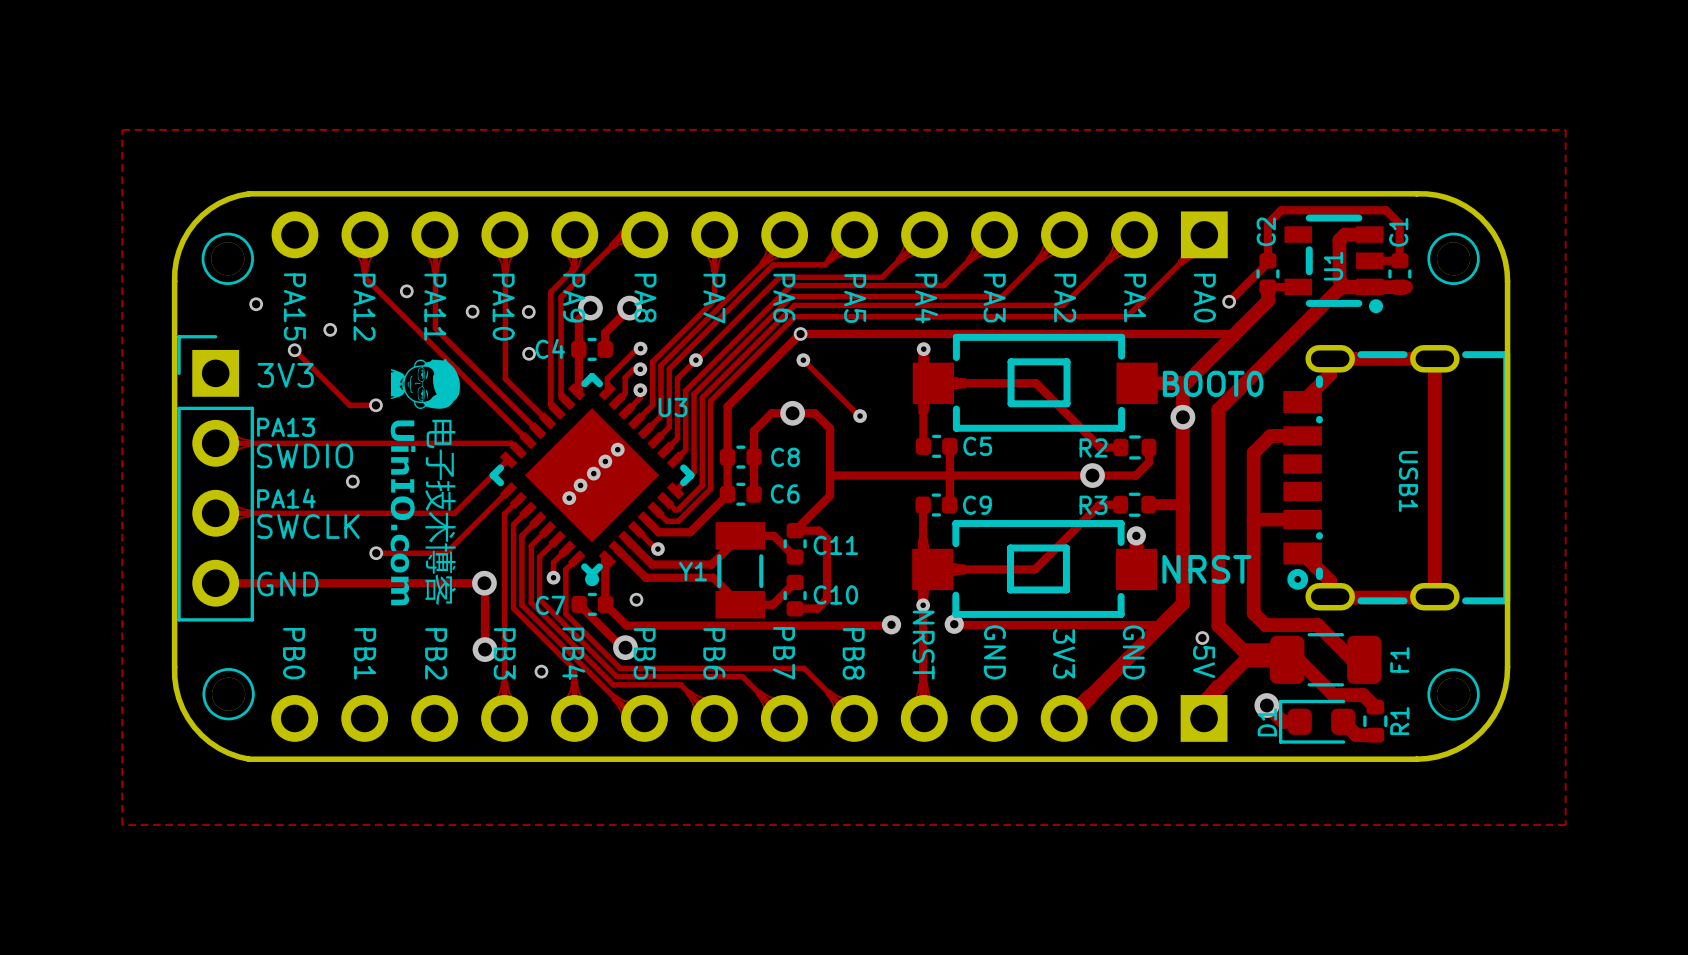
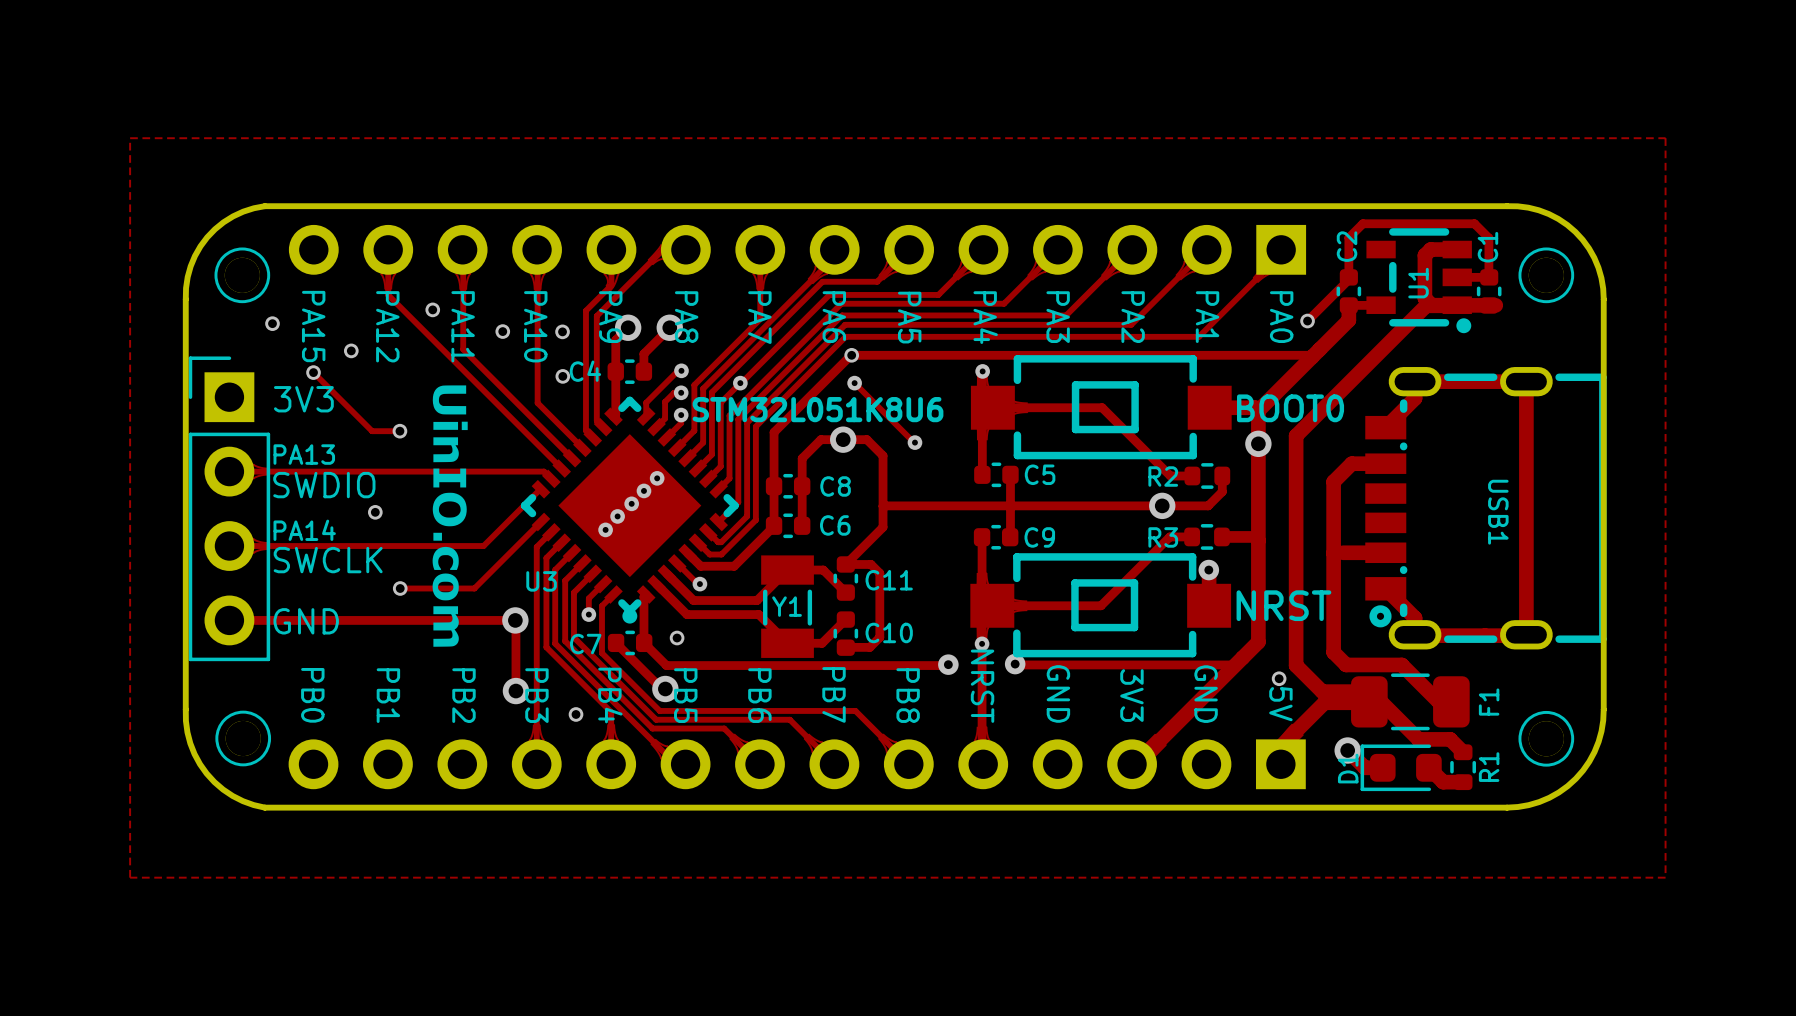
drawing shape: [390, 358, 460, 606] -> [432, 385, 468, 647]
text: none -> STM32L051K8U6 (818, 409)
U3 name position: U3 (673, 407) -> U3 (541, 581)
Y1 name position: Y1 (693, 571) -> Y1 (787, 606)

